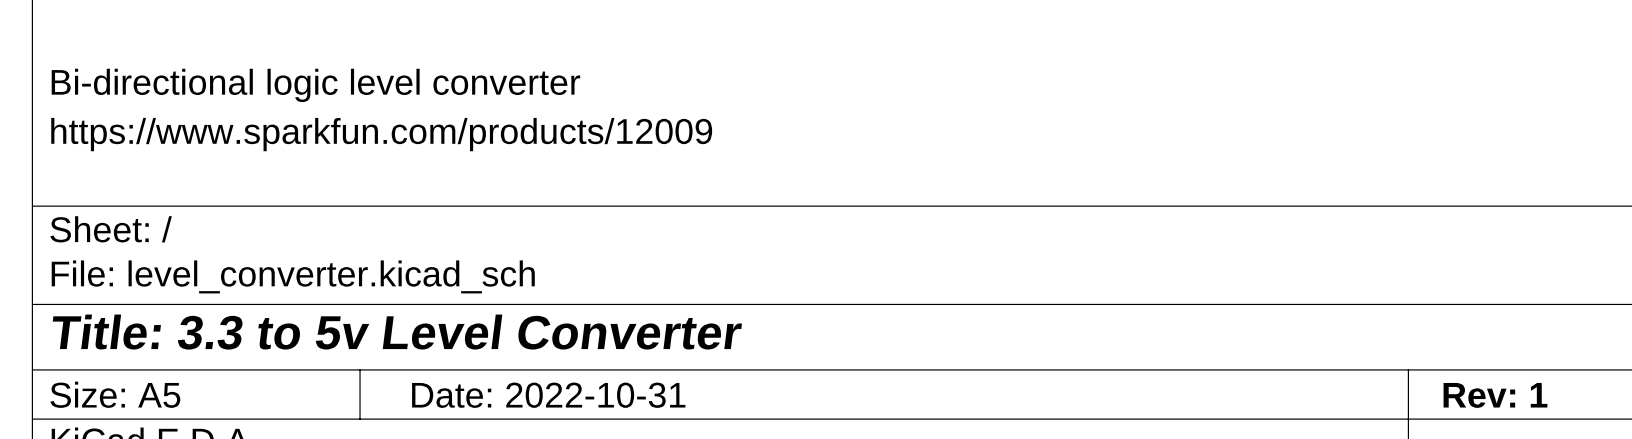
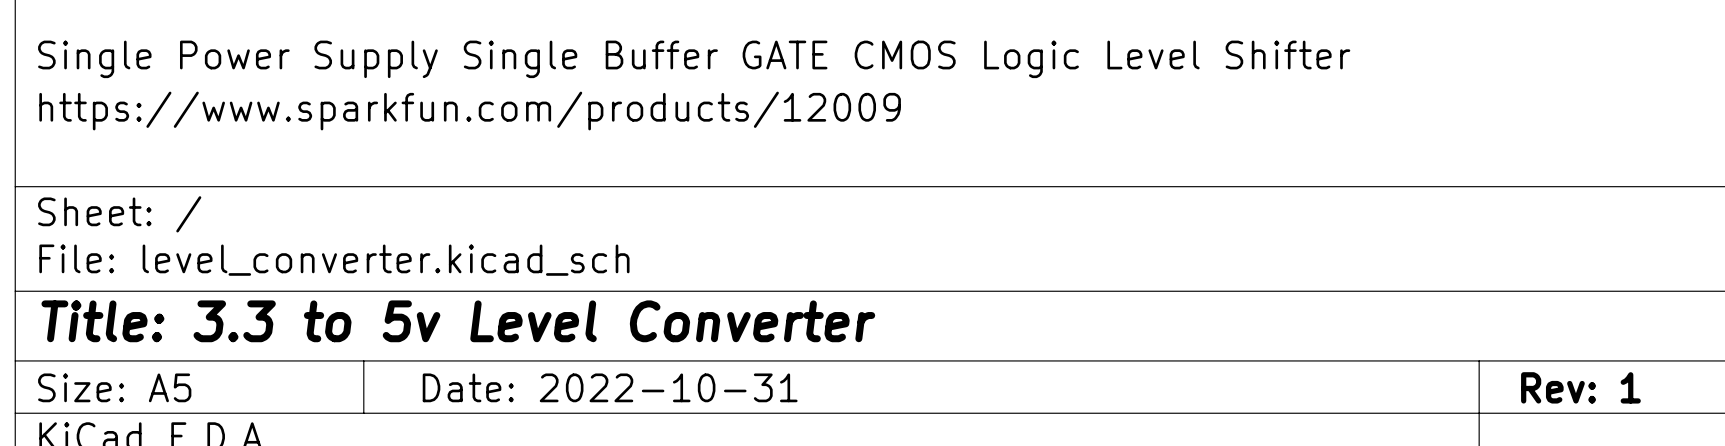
title block: Bi-directional logic level converter (315, 85) -> Single Power Supply Single Buffer GATE CMOS Logic Level Shifter (694, 59)

